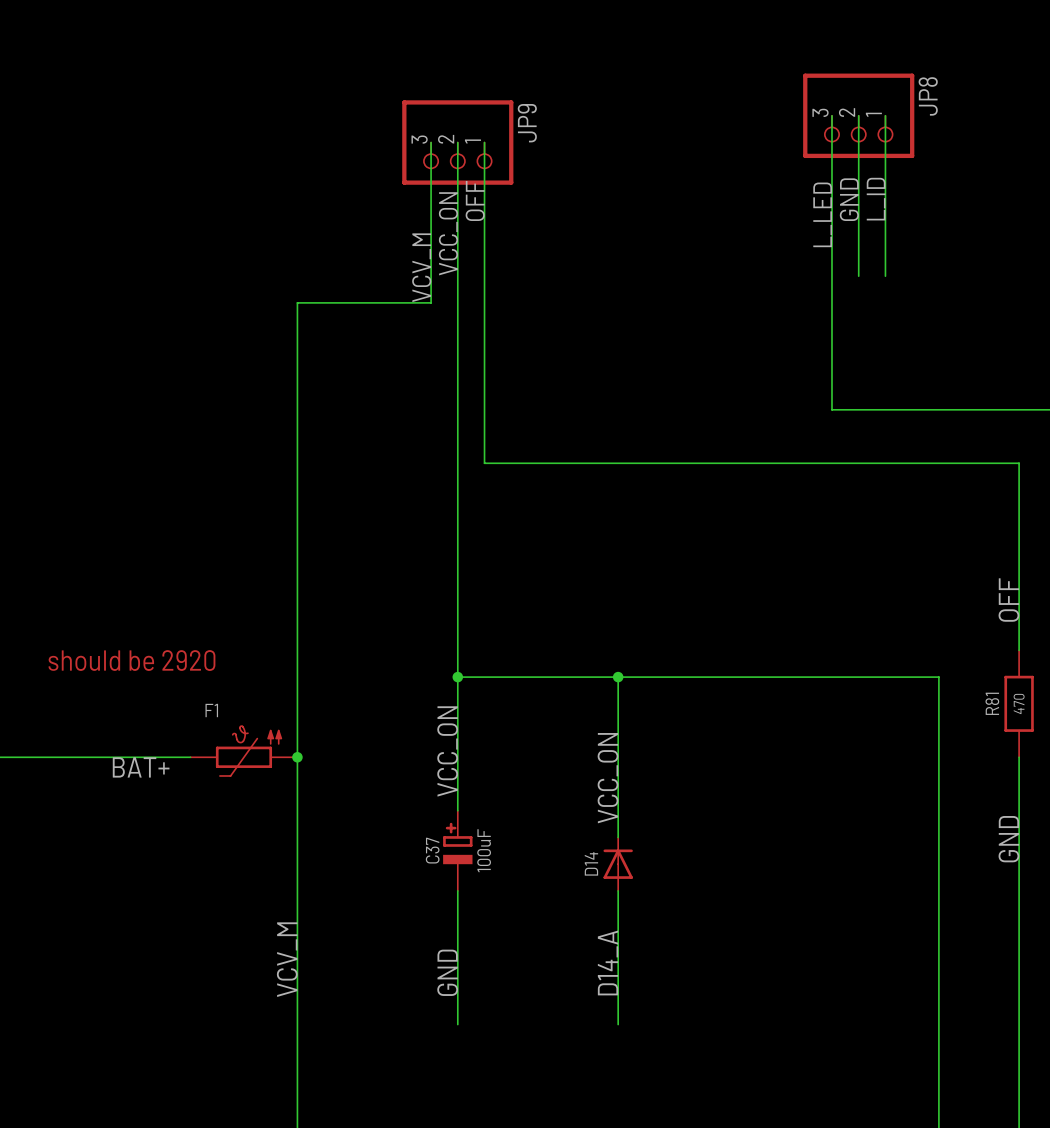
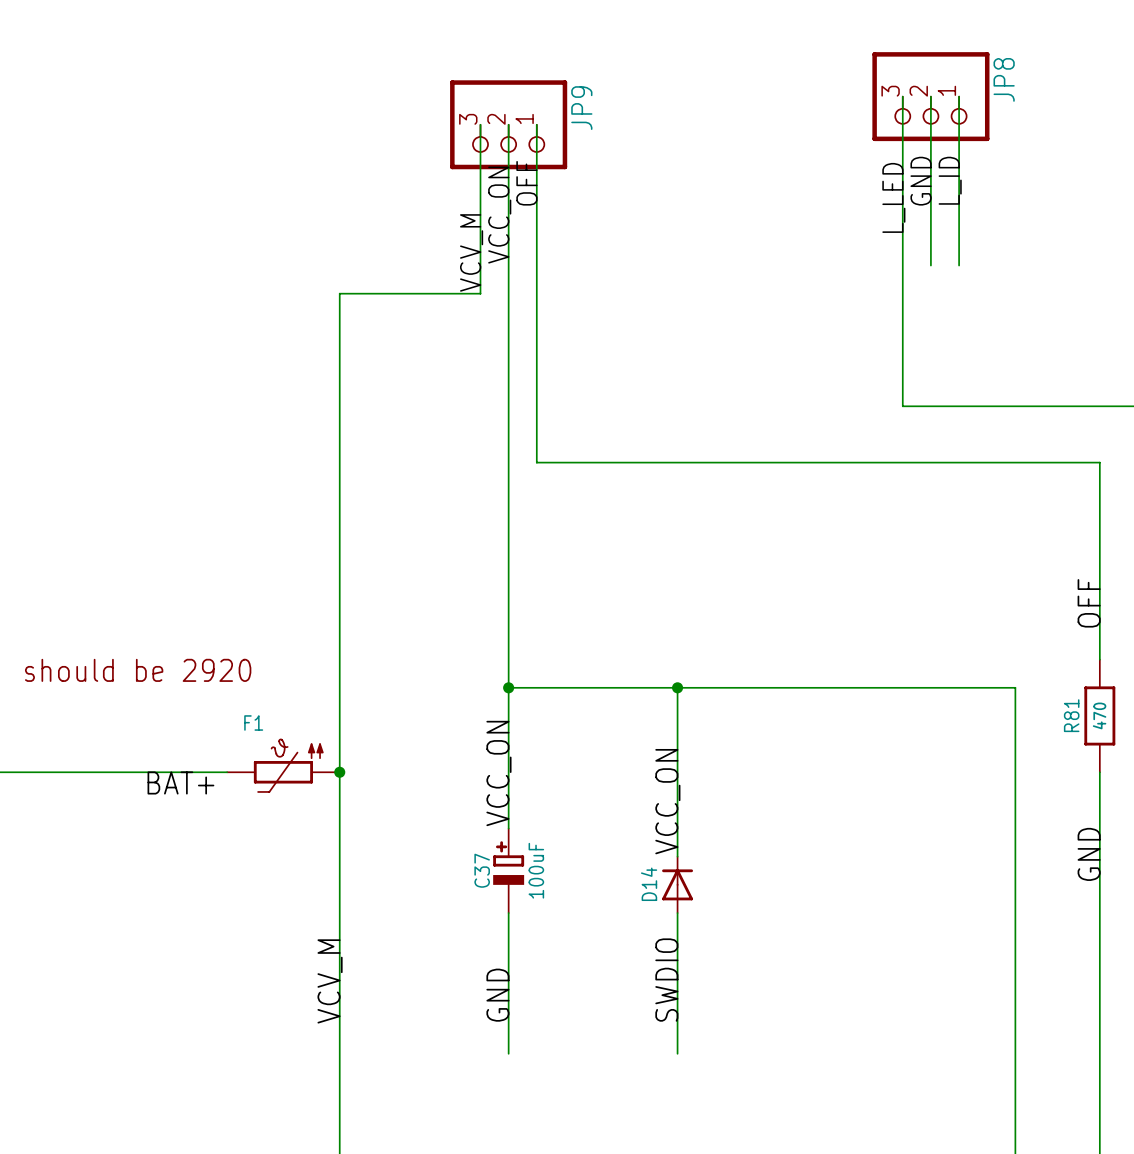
label: D14_A (608, 962) -> SWDIO (666, 980)

